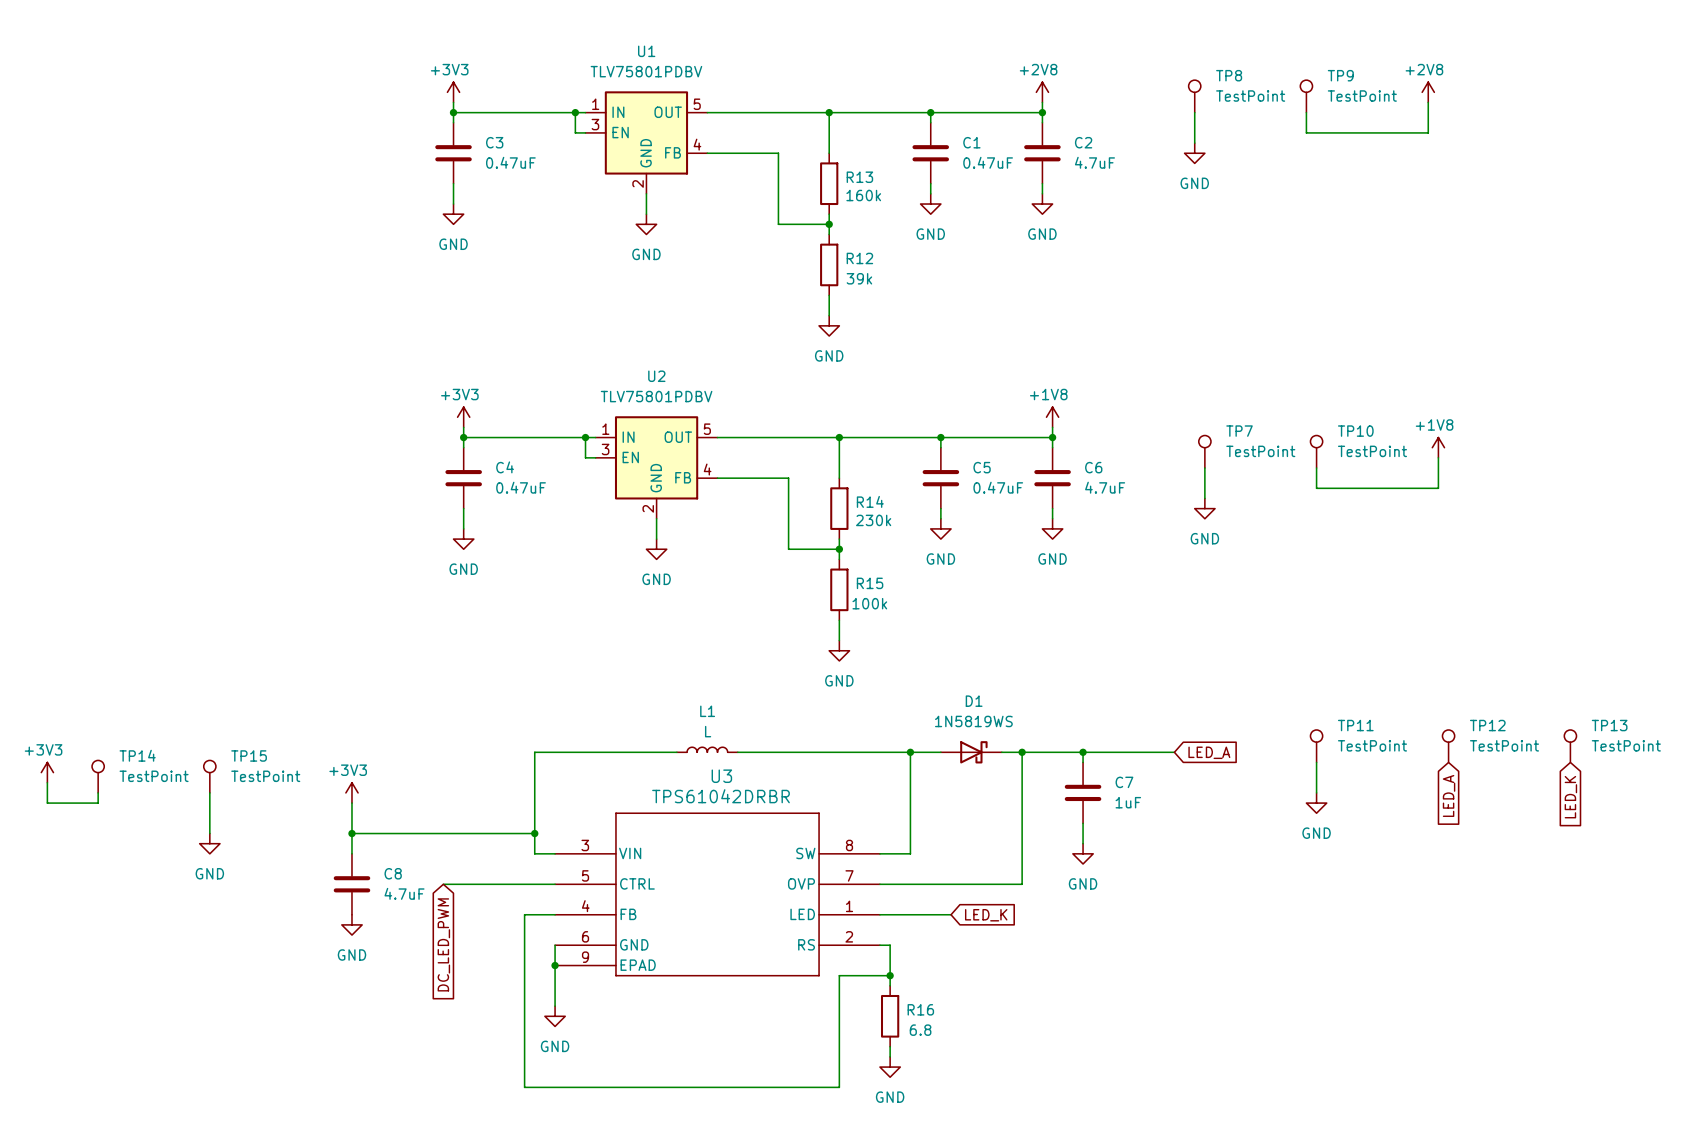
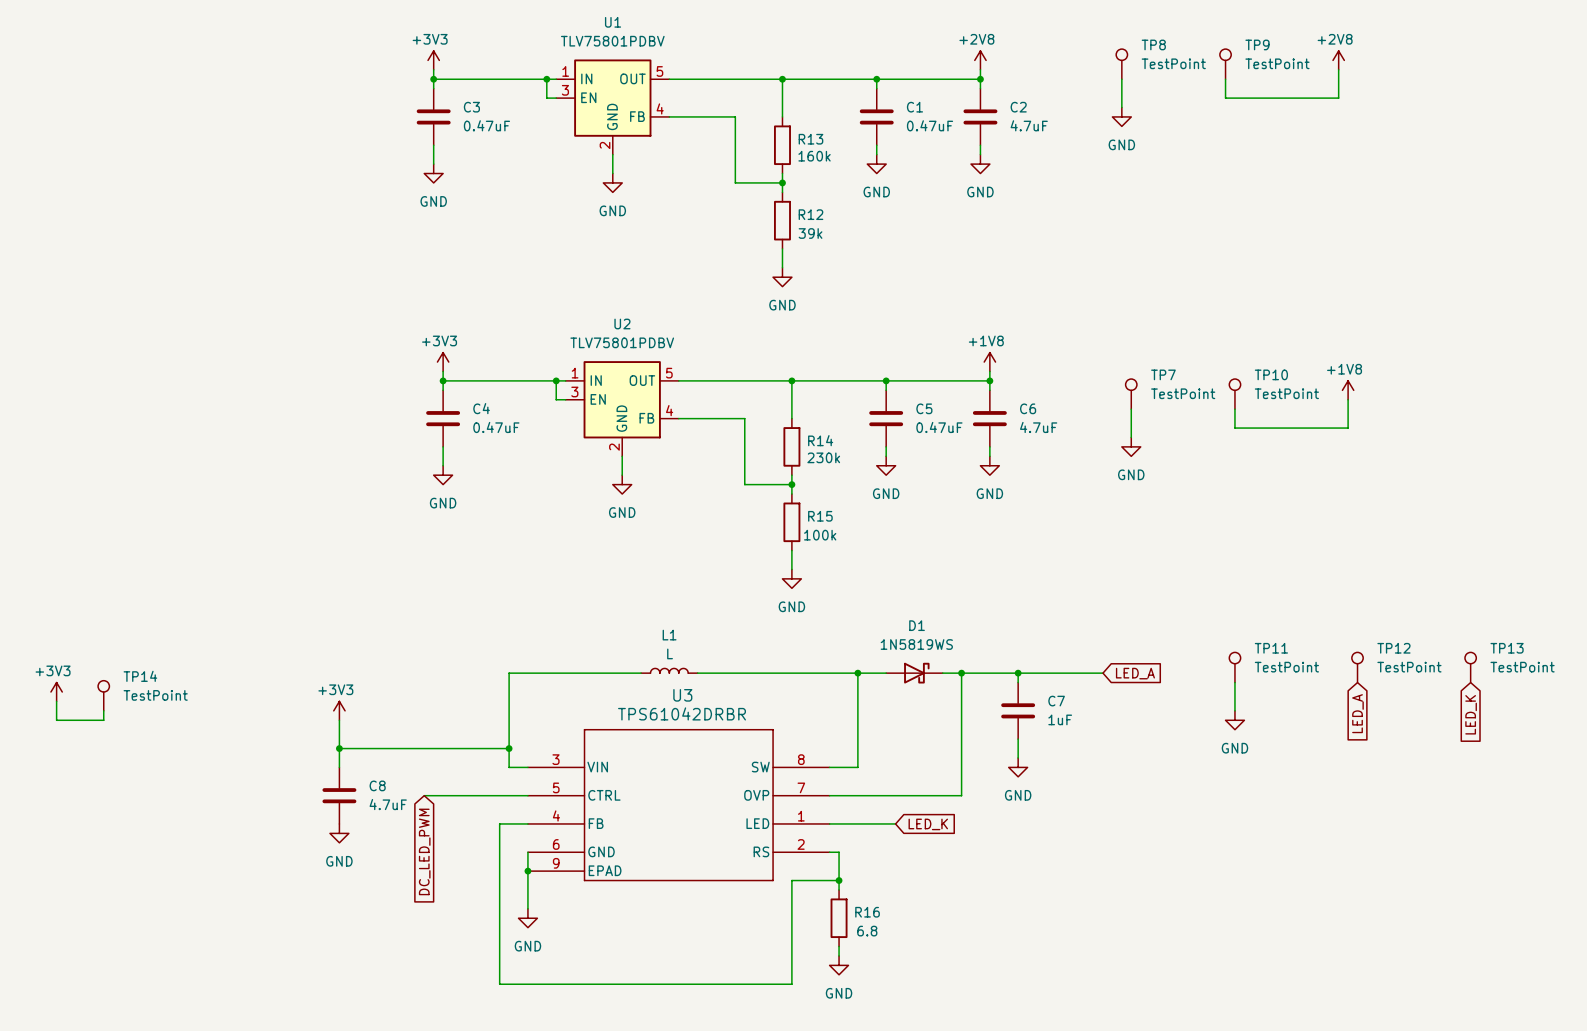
TP15: TestPoint (209, 776) -> none
wire: (209, 792) (209, 833) -> none
power symbol: GND (209, 843) -> none

